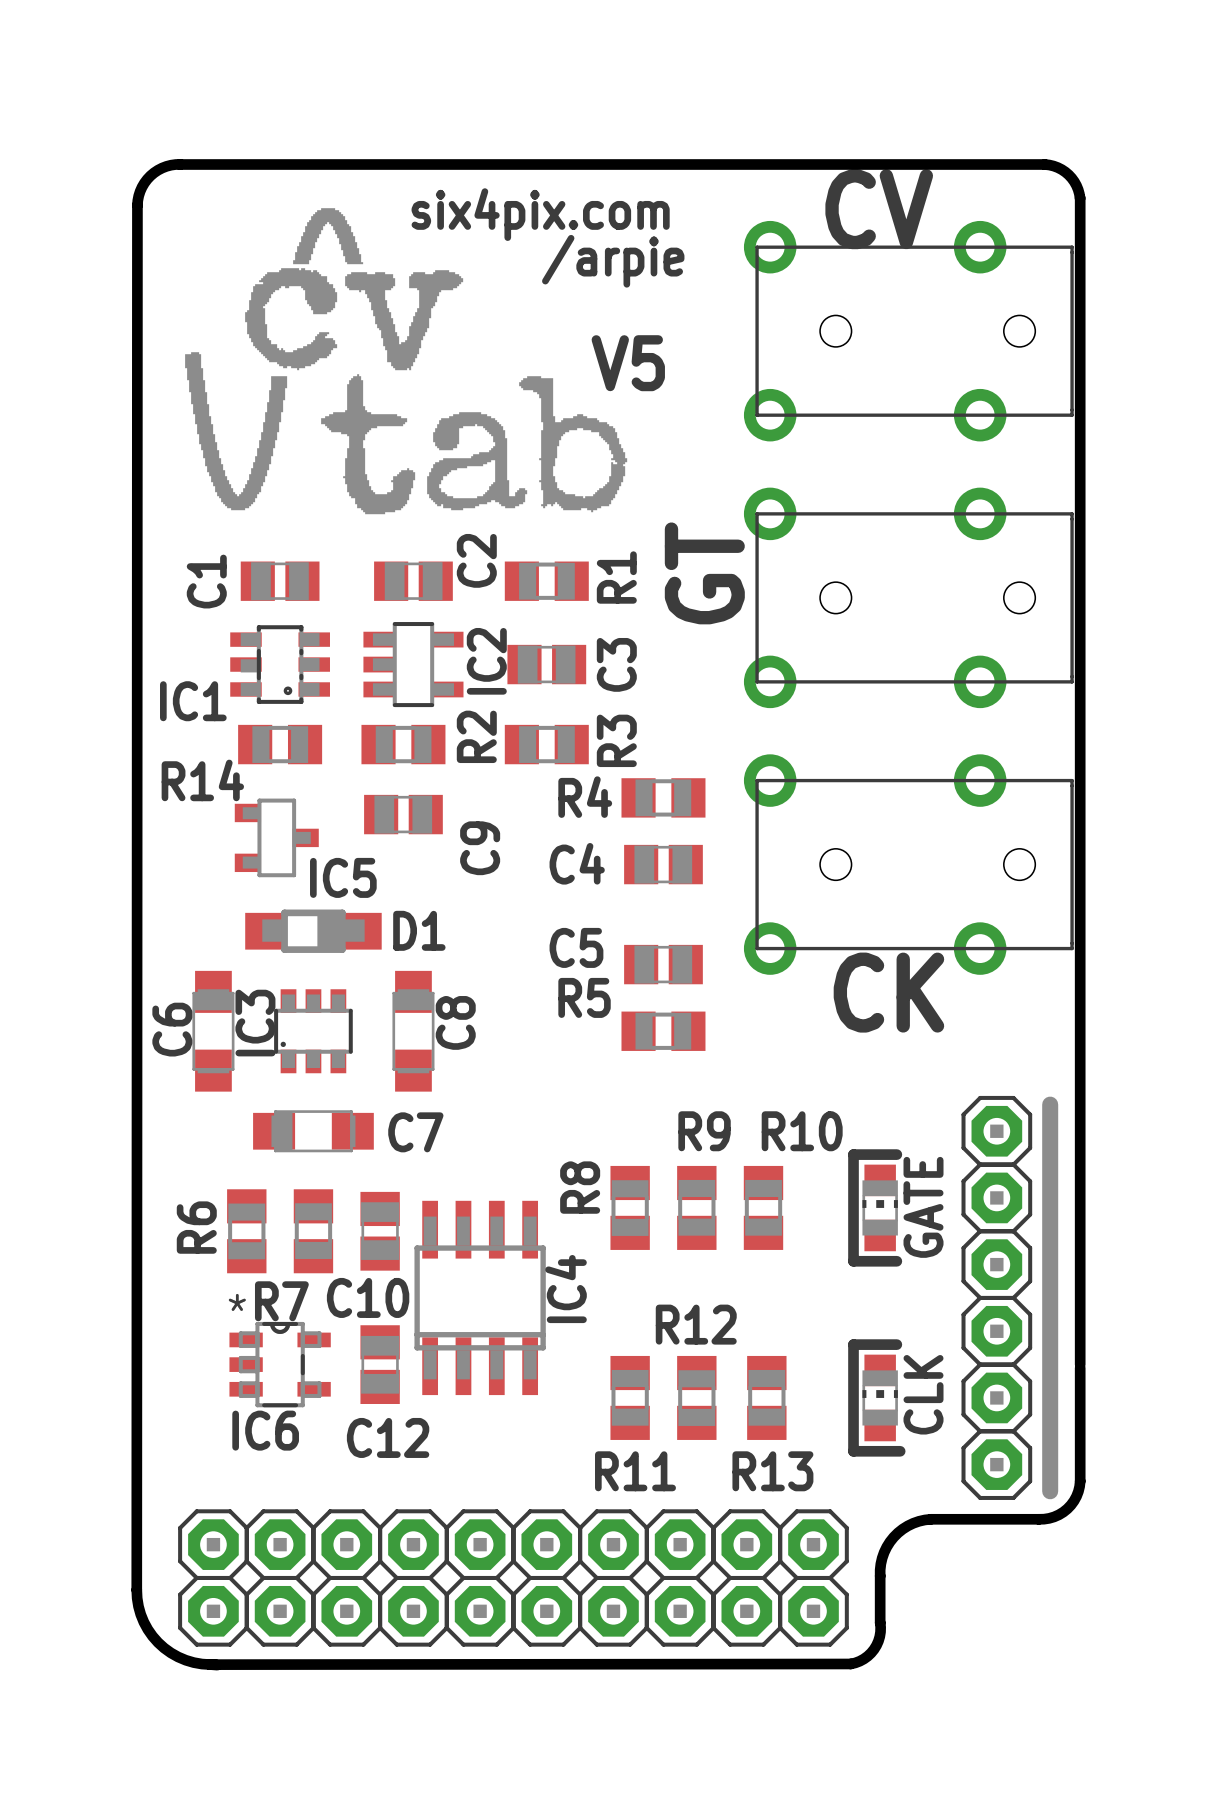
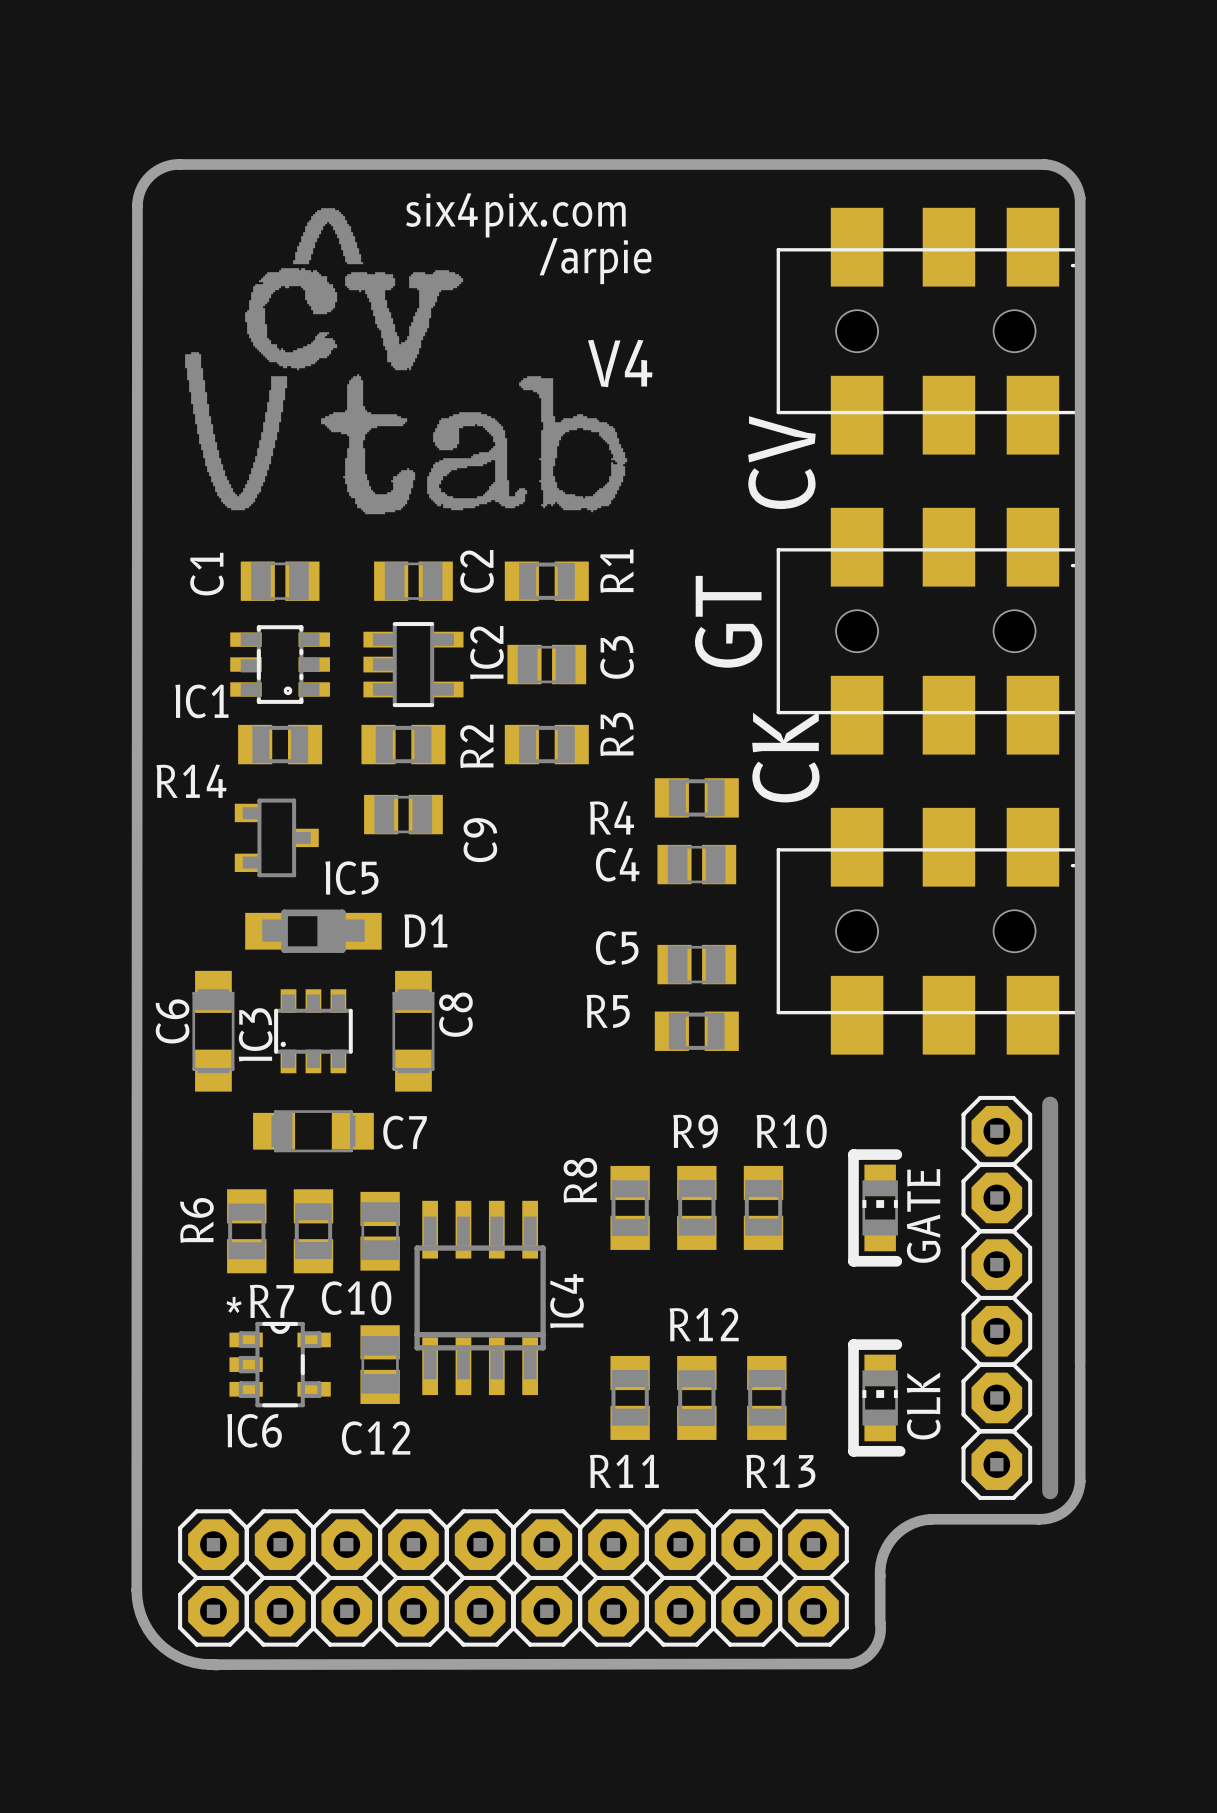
text rotation: 0° (879, 209) -> 90° counterclockwise (781, 462)
text position: CV (879, 209) -> CV (781, 462)
part footprint: [743, 220, 1074, 442] -> [776, 207, 1082, 455]
text: V5 (628, 363) -> V4 (620, 363)
text position: GT (704, 573) -> GT (728, 621)
part: (908, 597) -> none
part: none -> (929, 631)
R4 name position: R4 (585, 797) -> R4 (612, 817)
R4 position: (663, 797) -> (696, 797)
C4 position: (663, 864) -> (696, 864)
part: (908, 864) -> none
part: none -> (929, 931)
C5 position: (663, 964) -> (696, 964)
text rotation: 0° (888, 992) -> 90° counterclockwise (785, 757)
text position: CK (888, 992) -> CK (785, 757)
R5 name position: R5 (584, 997) -> R5 (608, 1011)
R5 position: (663, 1031) -> (696, 1031)

